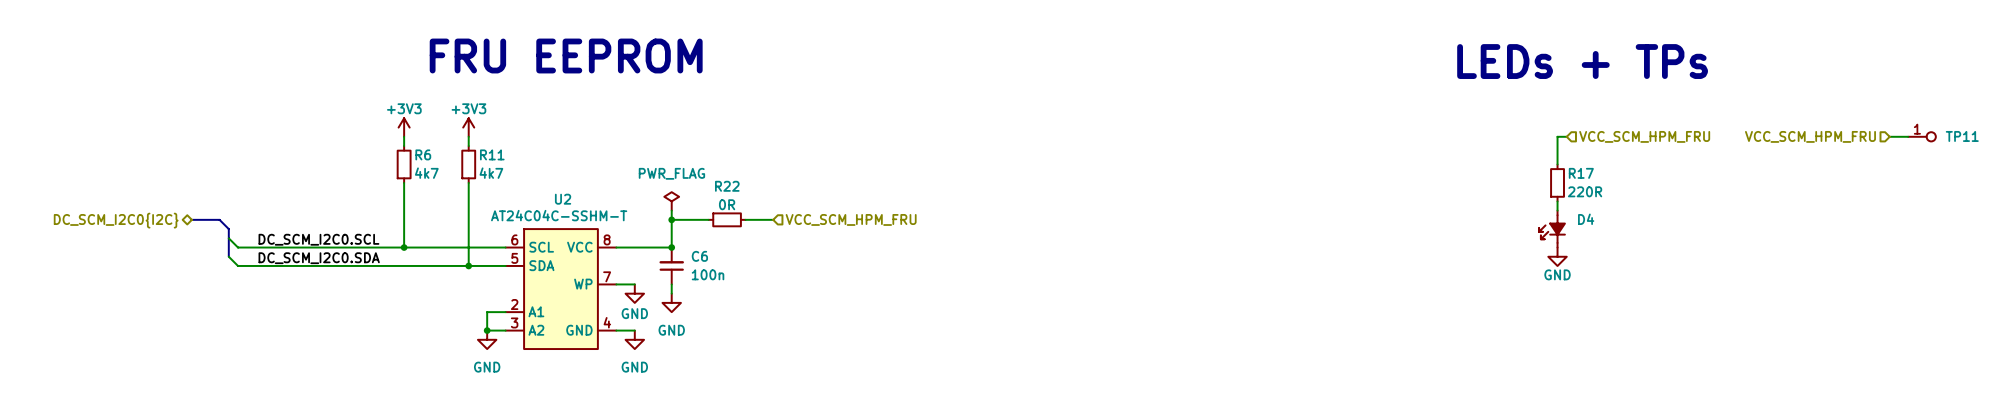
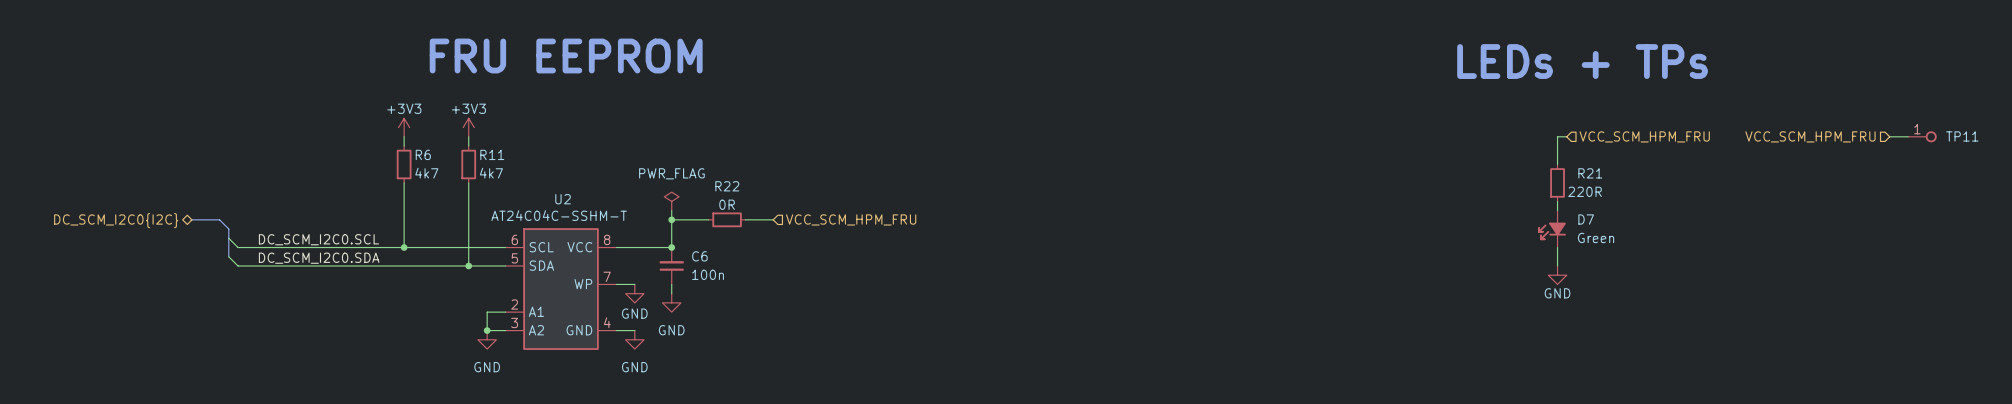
R17 name: R17 (1581, 173) -> R21 (1590, 173)
D4 name: D4 (1586, 219) -> D7 (1586, 219)
D4 text: none -> Green (1596, 237)
power symbol position: GND (1557, 256) -> GND (1557, 275)

